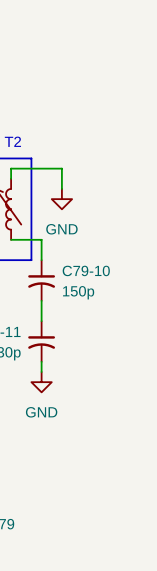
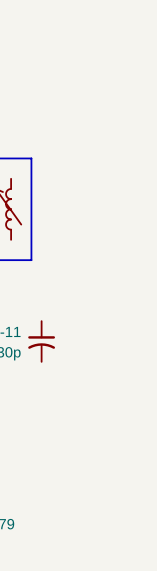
text: T2 (12, 141) -> none
wire: (11, 178) (11, 168) (61, 168) (61, 188) -> none
power symbol: GND (61, 199) -> none
wire: (11, 239) (41, 239) (41, 260) -> none
C79-10: 150p (41, 280) -> none
wire: (41, 300) (41, 321) -> none
wire: (41, 361) (41, 372) -> none
power symbol: GND (41, 382) -> none

